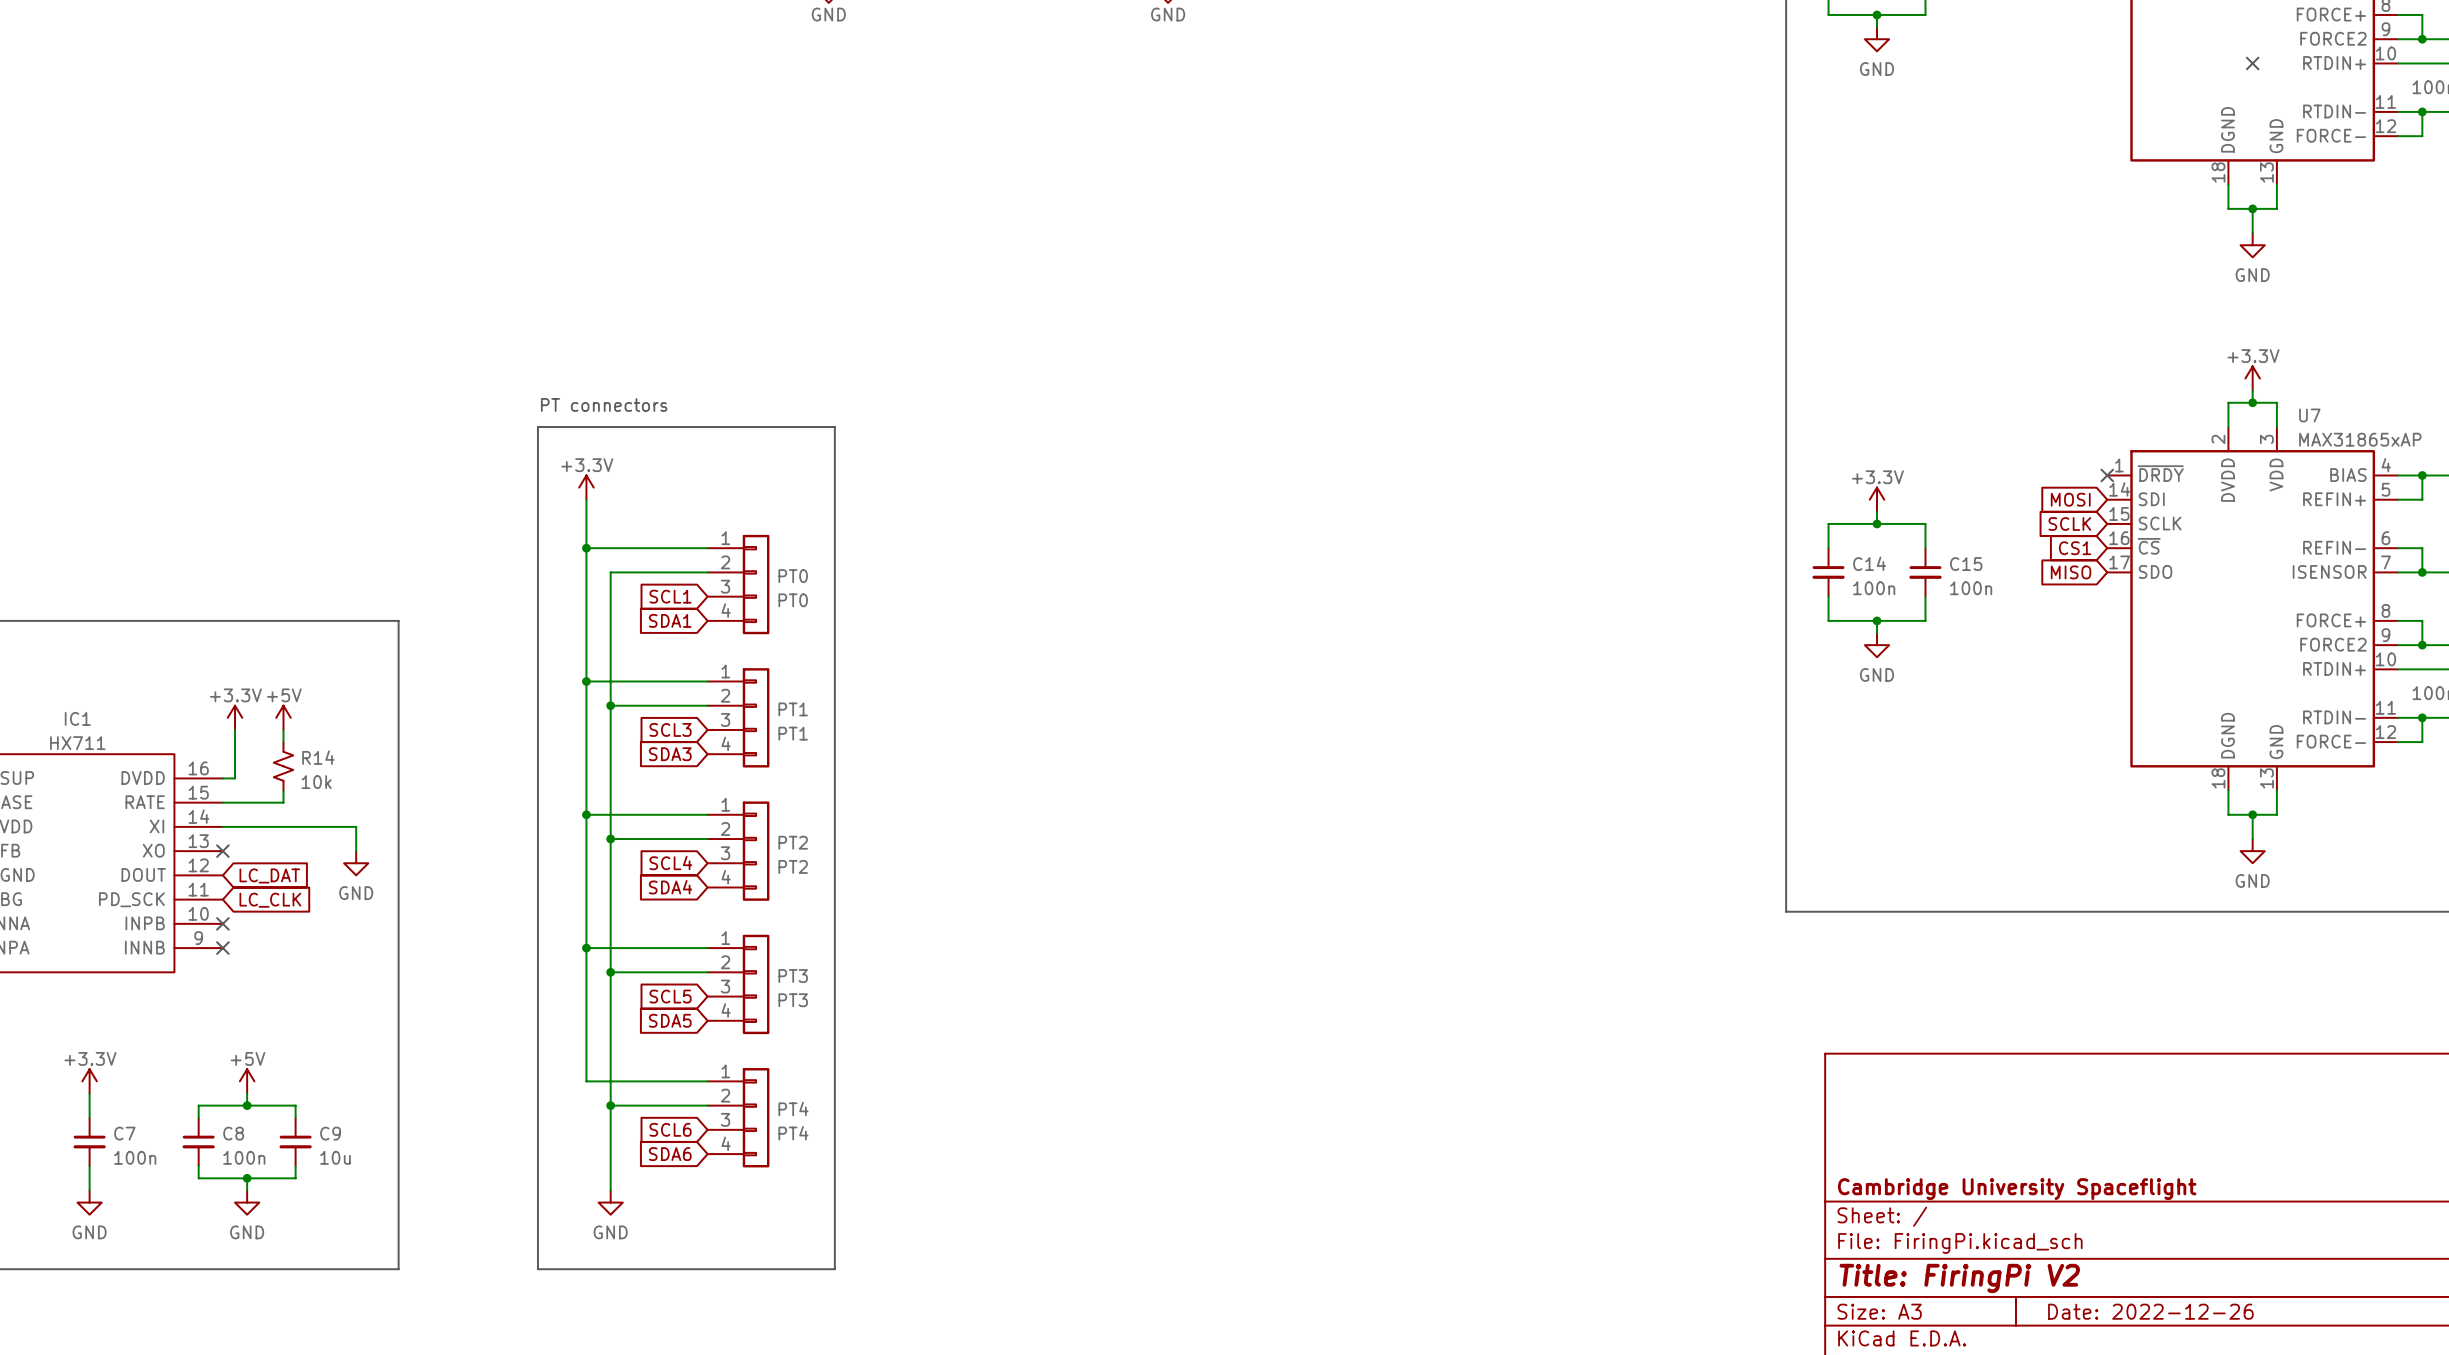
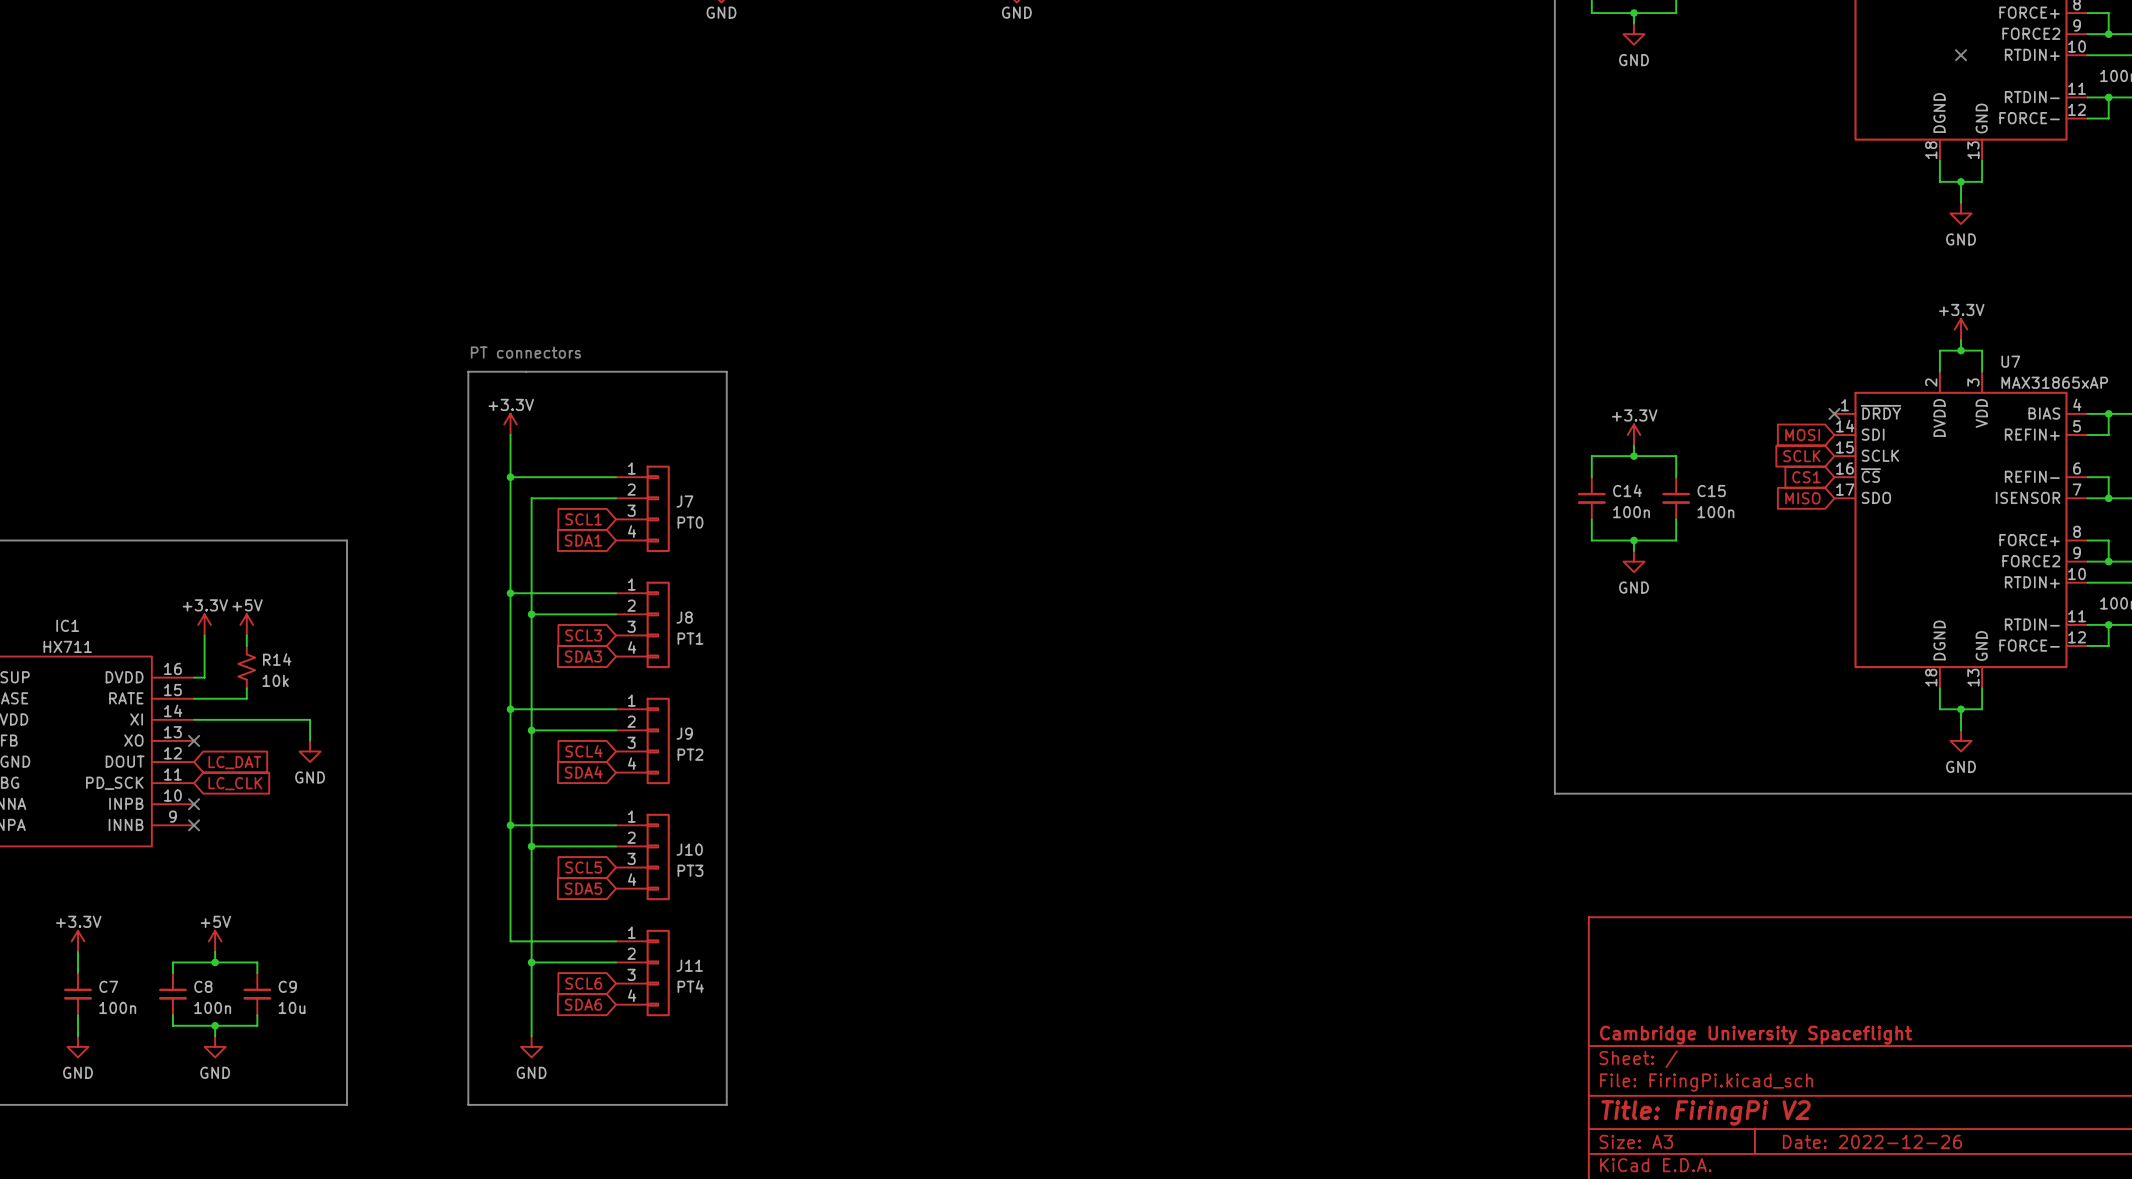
PT0 name: PT0 (793, 576) -> J7 (684, 501)
PT1 name: PT1 (793, 709) -> J8 (684, 617)
PT2 name: PT2 (793, 842) -> J9 (684, 733)
PT3 name: PT3 (793, 976) -> J10 (689, 849)
PT4 name: PT4 (793, 1109) -> J11 (689, 965)

